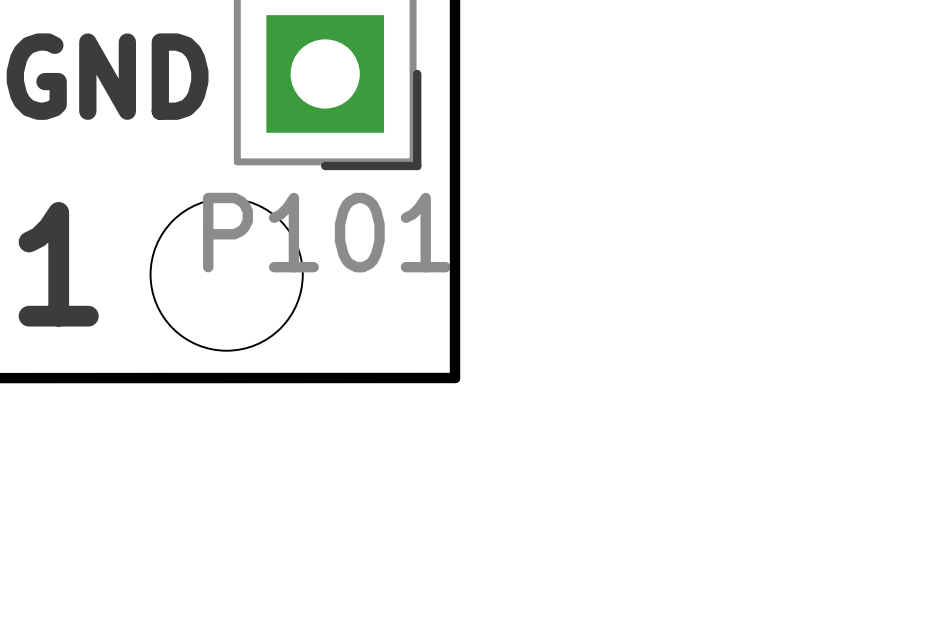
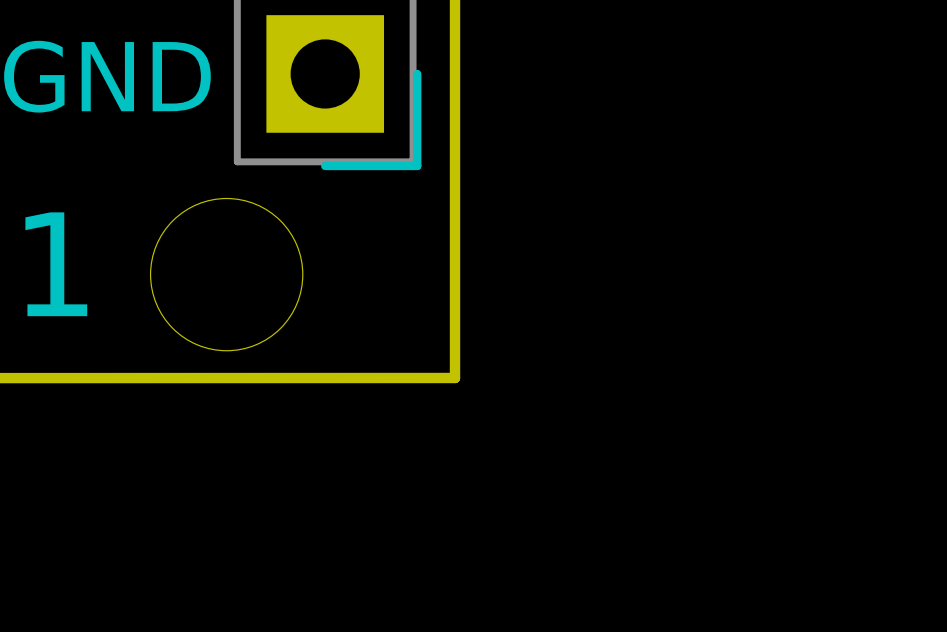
P101 name: P101 (326, 232) -> none

